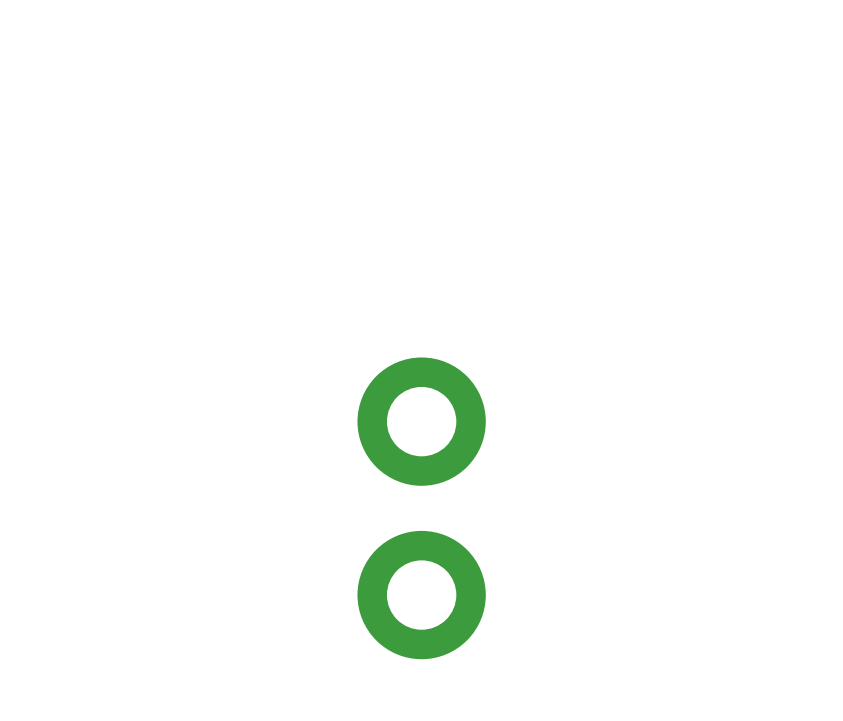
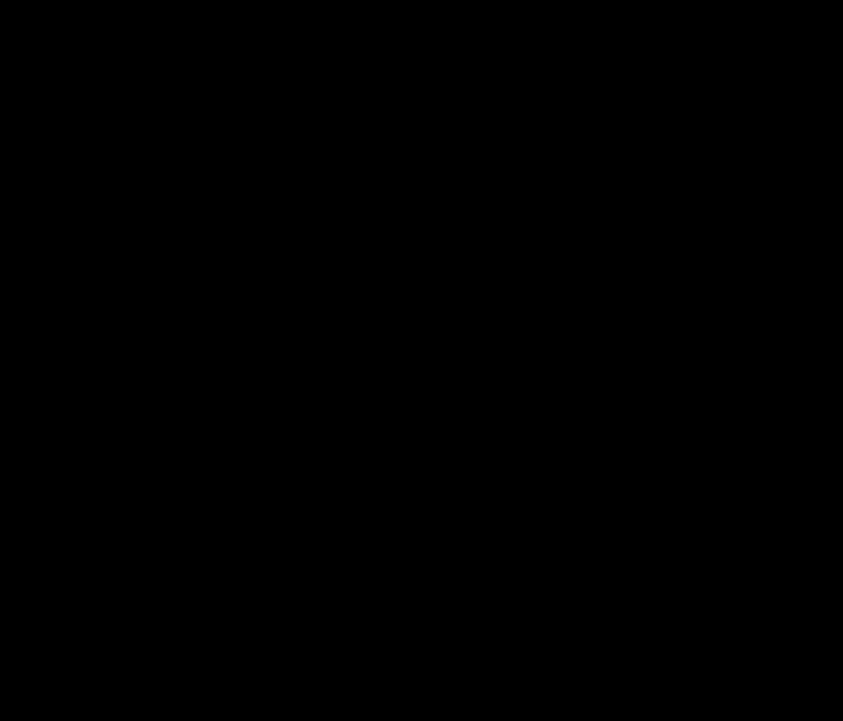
part: (421, 508) -> none

